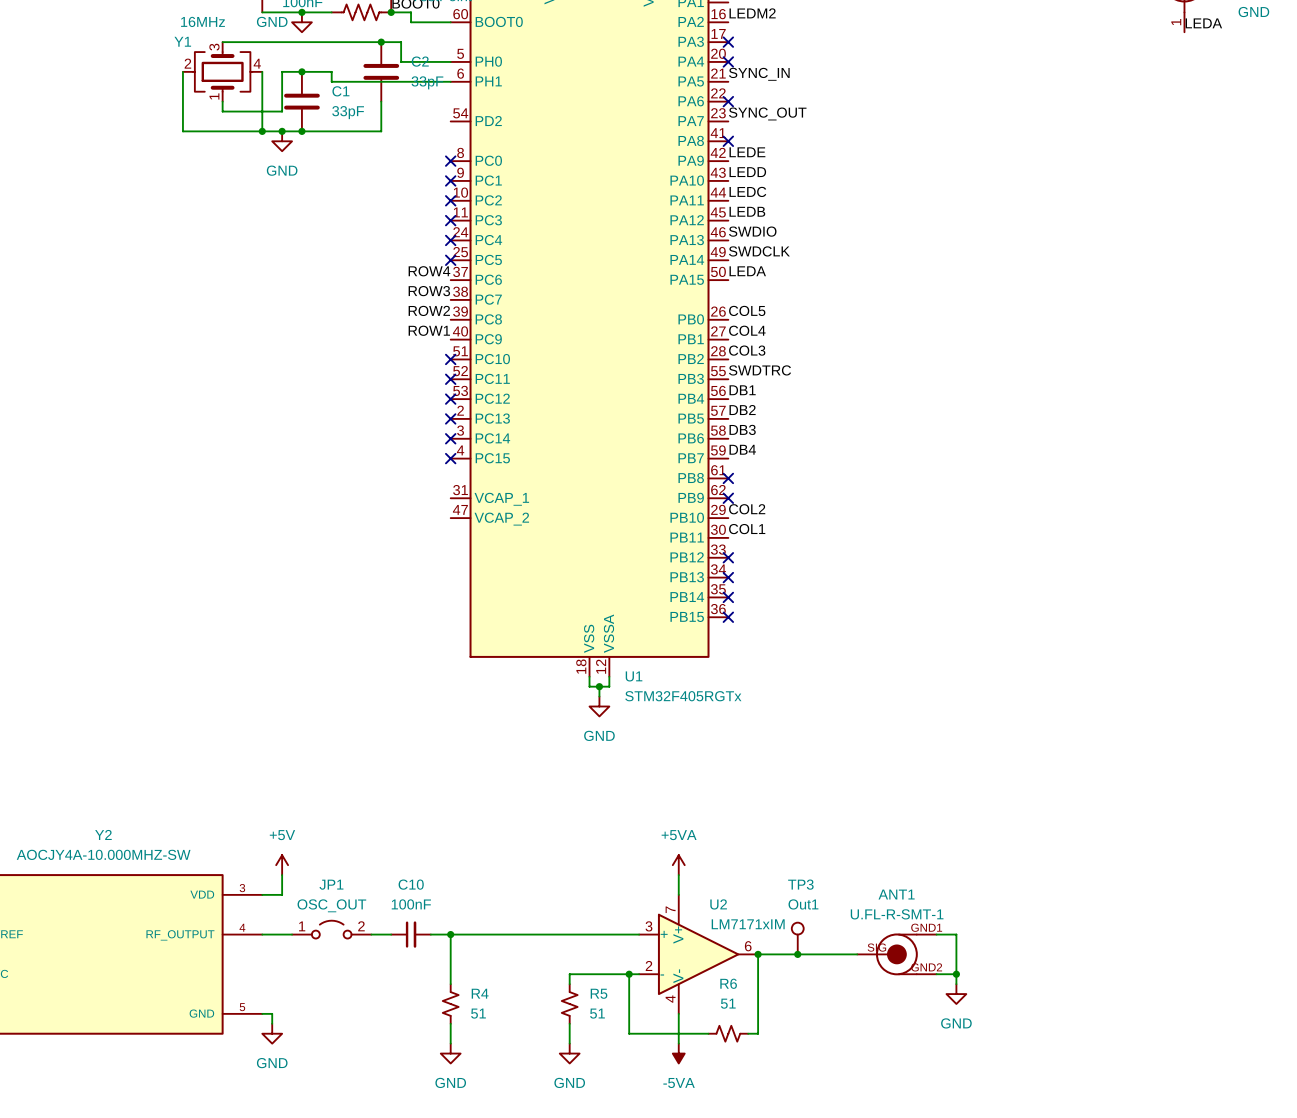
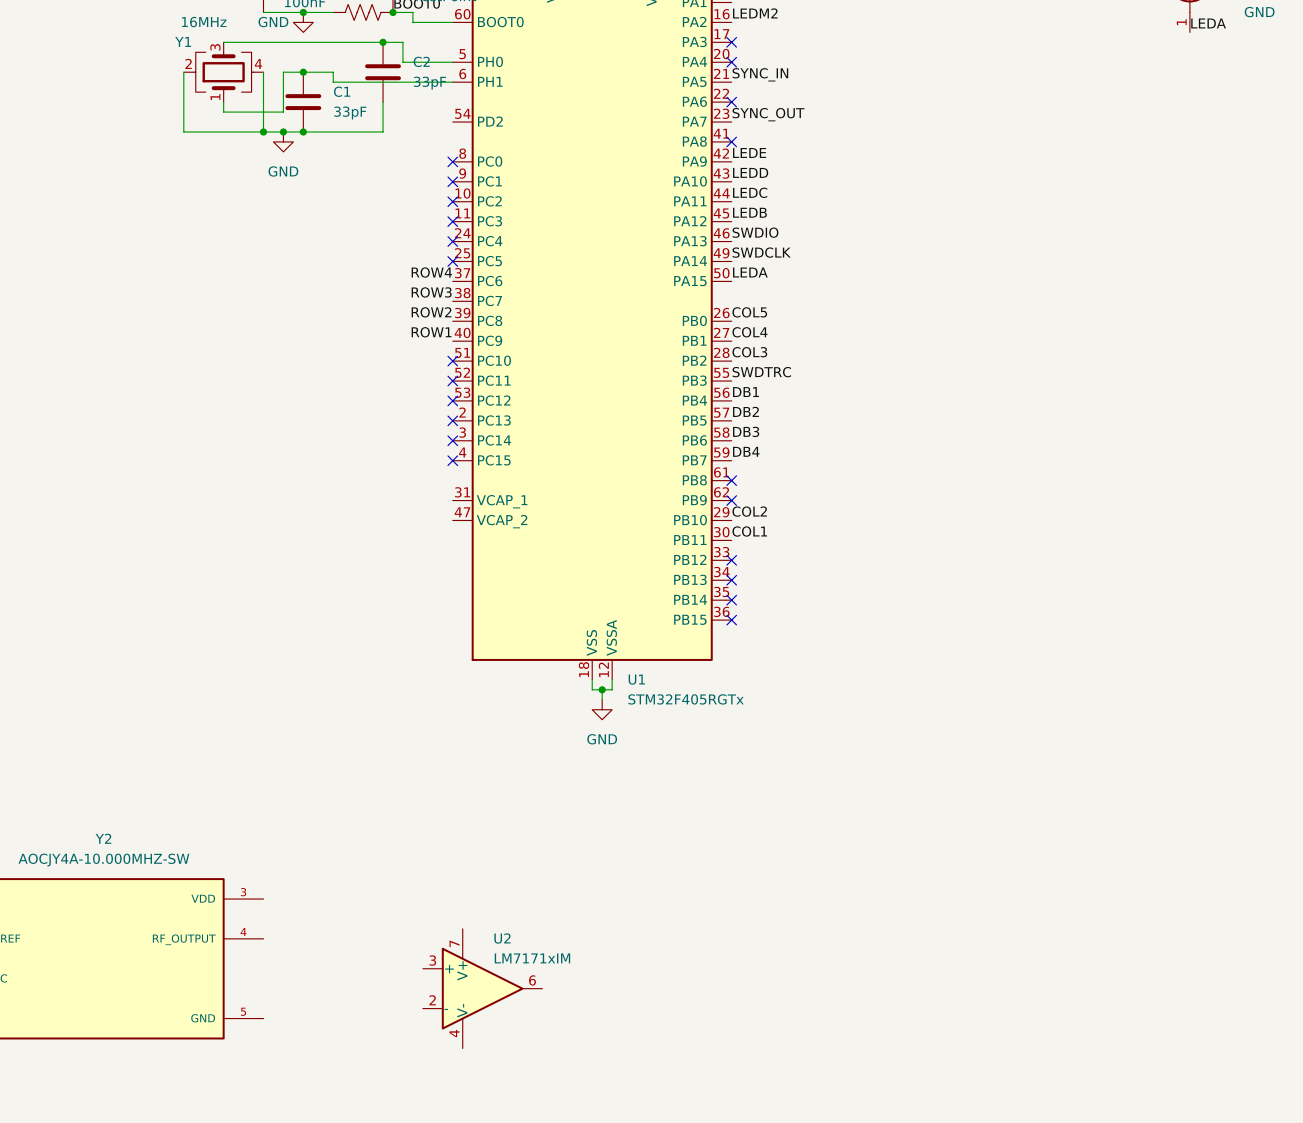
power symbol: +5V (282, 865) -> none
power symbol: +5VA (678, 865) -> none
wire: (282, 875) (282, 894) (262, 894) -> none
wire: (678, 875) (678, 894) -> none
JP1: OSC_OUT (331, 929) -> none
wire: (262, 934) (292, 934) -> none
wire: (371, 934) (391, 934) -> none
C10: 100nF (411, 934) -> none
wire: (430, 934) (639, 934) -> none
junction: (450, 934) -> none
wire: (936, 934) (956, 934) (956, 984) -> none
TP3: Out1 (797, 938) -> none
U2 position: (698, 954) -> (482, 988)
junction: (758, 954) -> none
junction: (797, 954) -> none
wire: (857, 954) (758, 954) (758, 1033) (748, 1033) -> none
ANT1: U.FL-R-SMT-1 (896, 954) -> none
wire: (629, 974) (629, 1033) (708, 1033) -> none
junction: (629, 974) -> none
wire: (639, 974) (569, 974) (569, 984) -> none
wire: (936, 974) (956, 974) -> none
junction: (956, 974) -> none
power symbol: GND (956, 994) -> none
R4: 51 (450, 1003) -> none
R5: 51 (569, 1003) -> none
wire: (262, 1013) (272, 1013) (272, 1023) -> none
wire: (678, 1013) (678, 1043) -> none
wire: (450, 1023) (450, 1043) -> none
wire: (569, 1023) (569, 1043) -> none
power symbol: GND (272, 1033) -> none
R6: 51 (728, 1033) -> none
power symbol: GND (450, 1053) -> none
power symbol: GND (569, 1053) -> none
power symbol: -5VA (678, 1053) -> none

